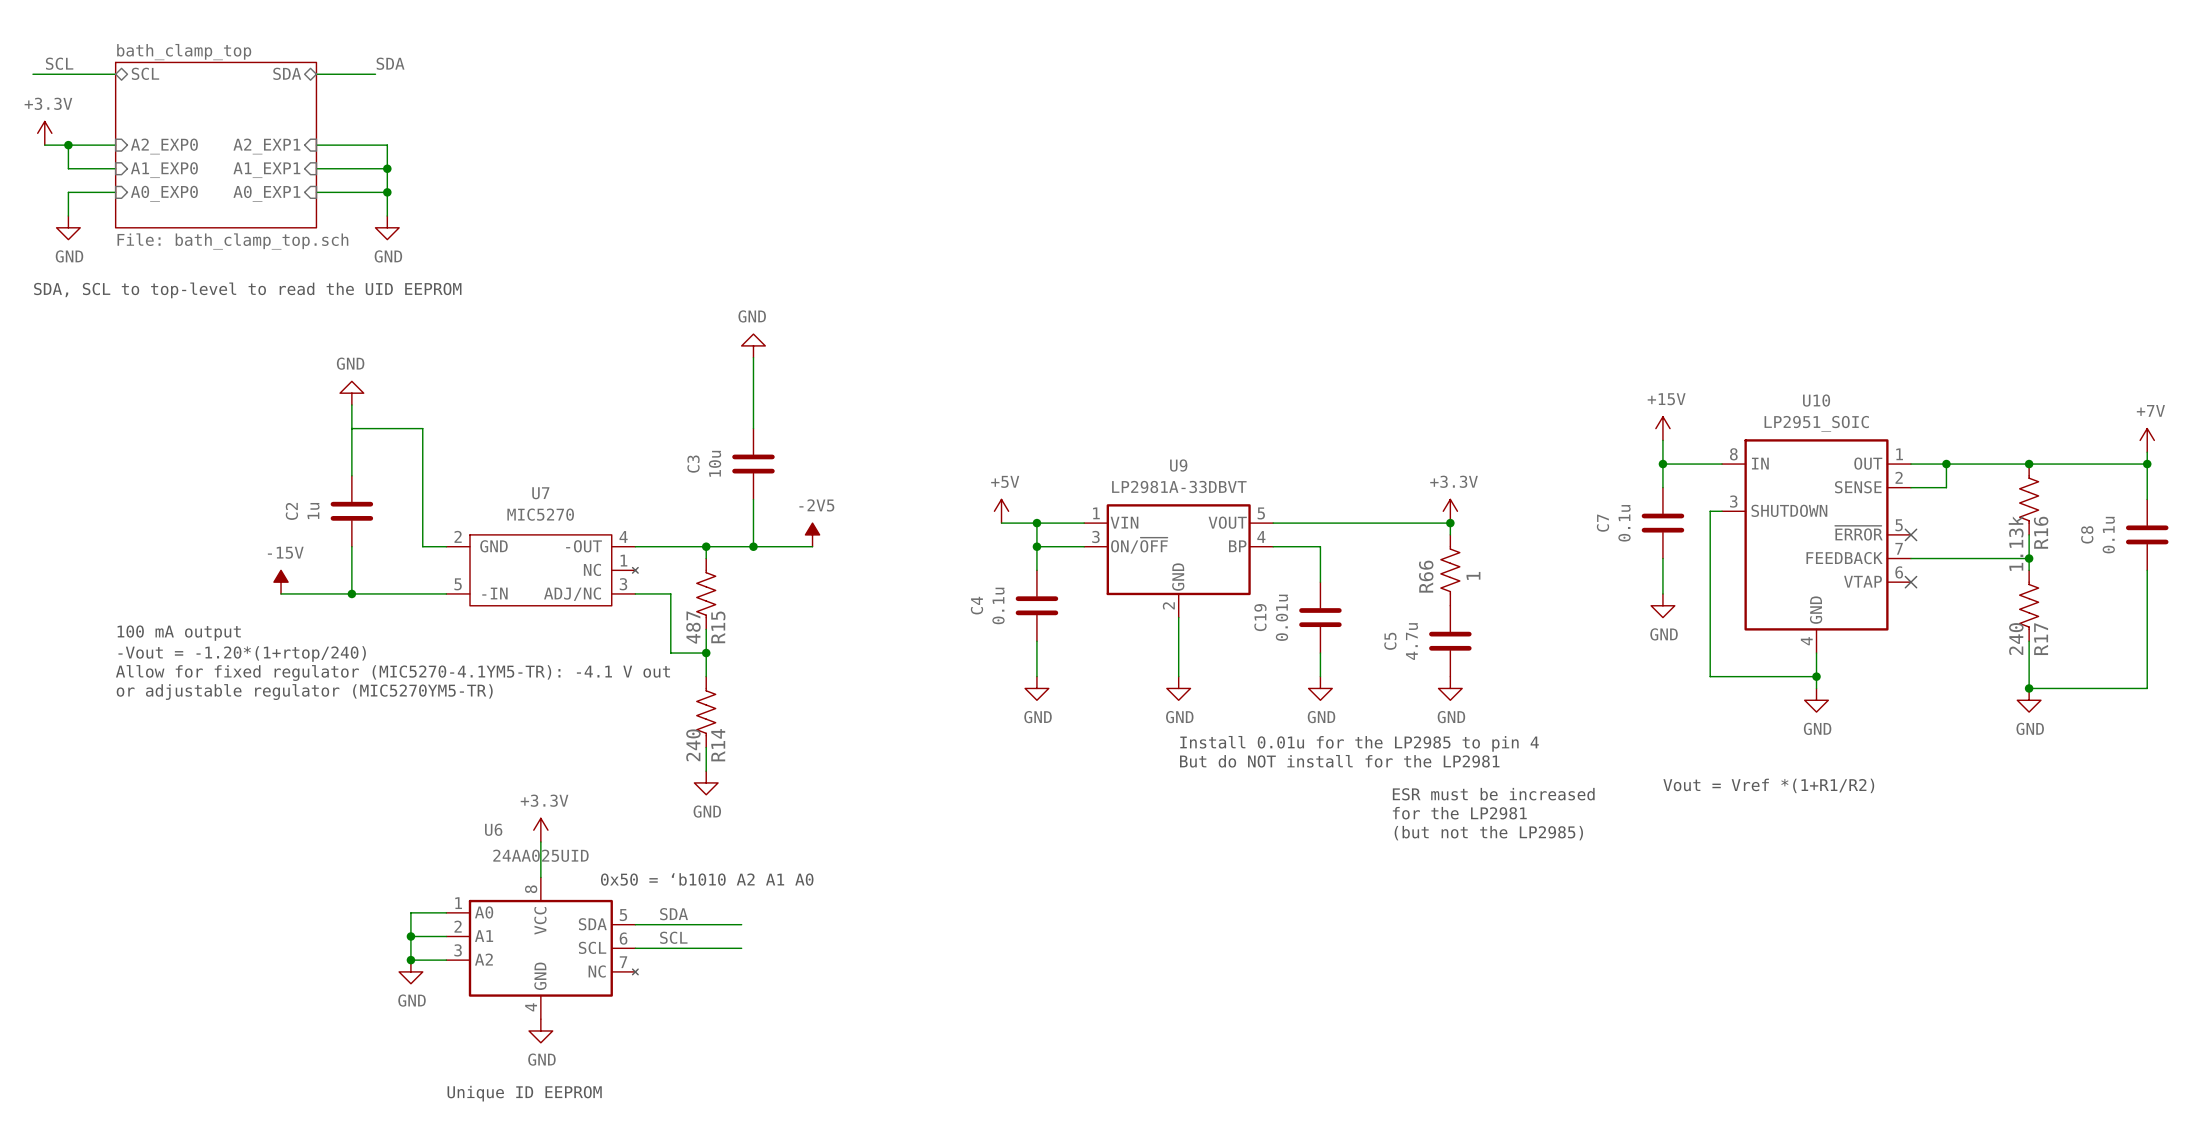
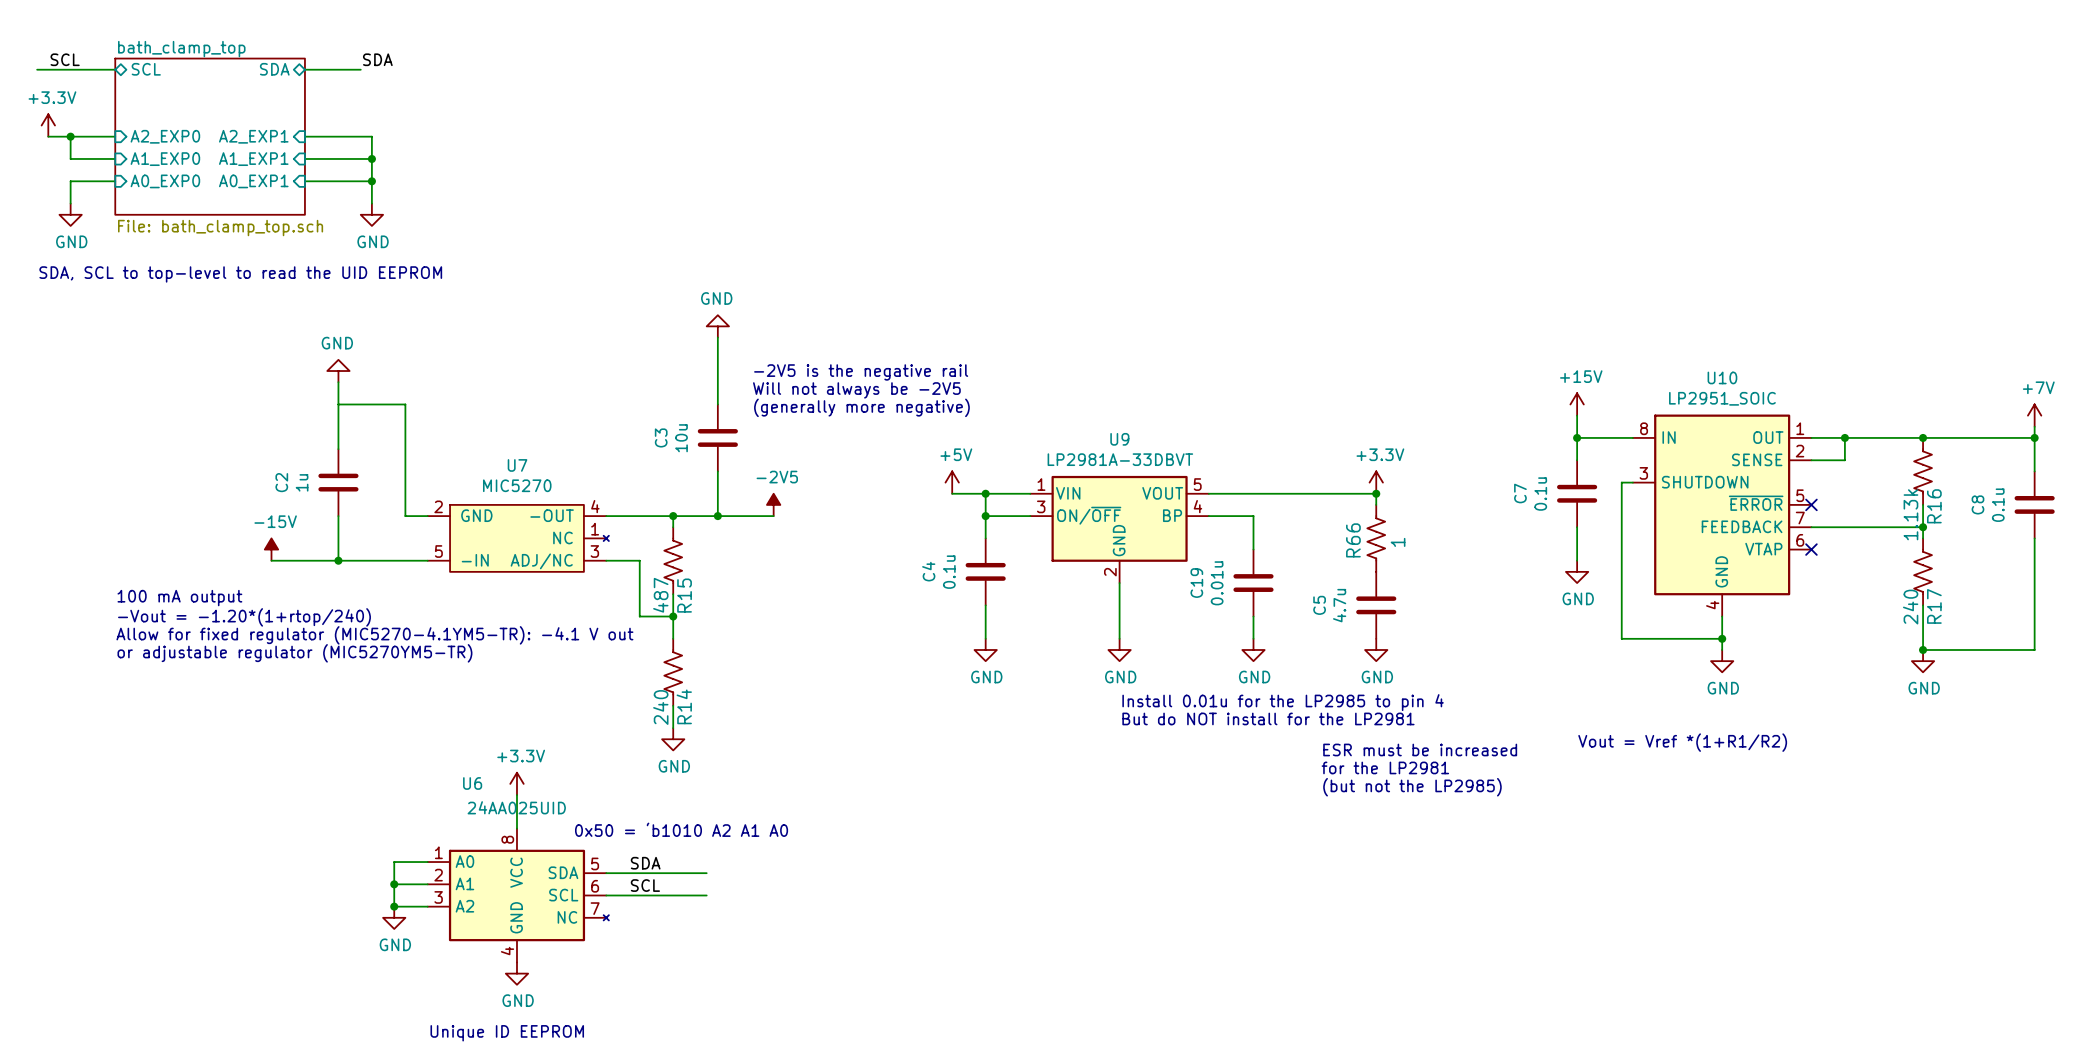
text: none -> -2V5 is the negative rail (861, 372)
text: none -> Will not always be -2V5 (856, 390)
text: none -> (generally more negative) (861, 407)

